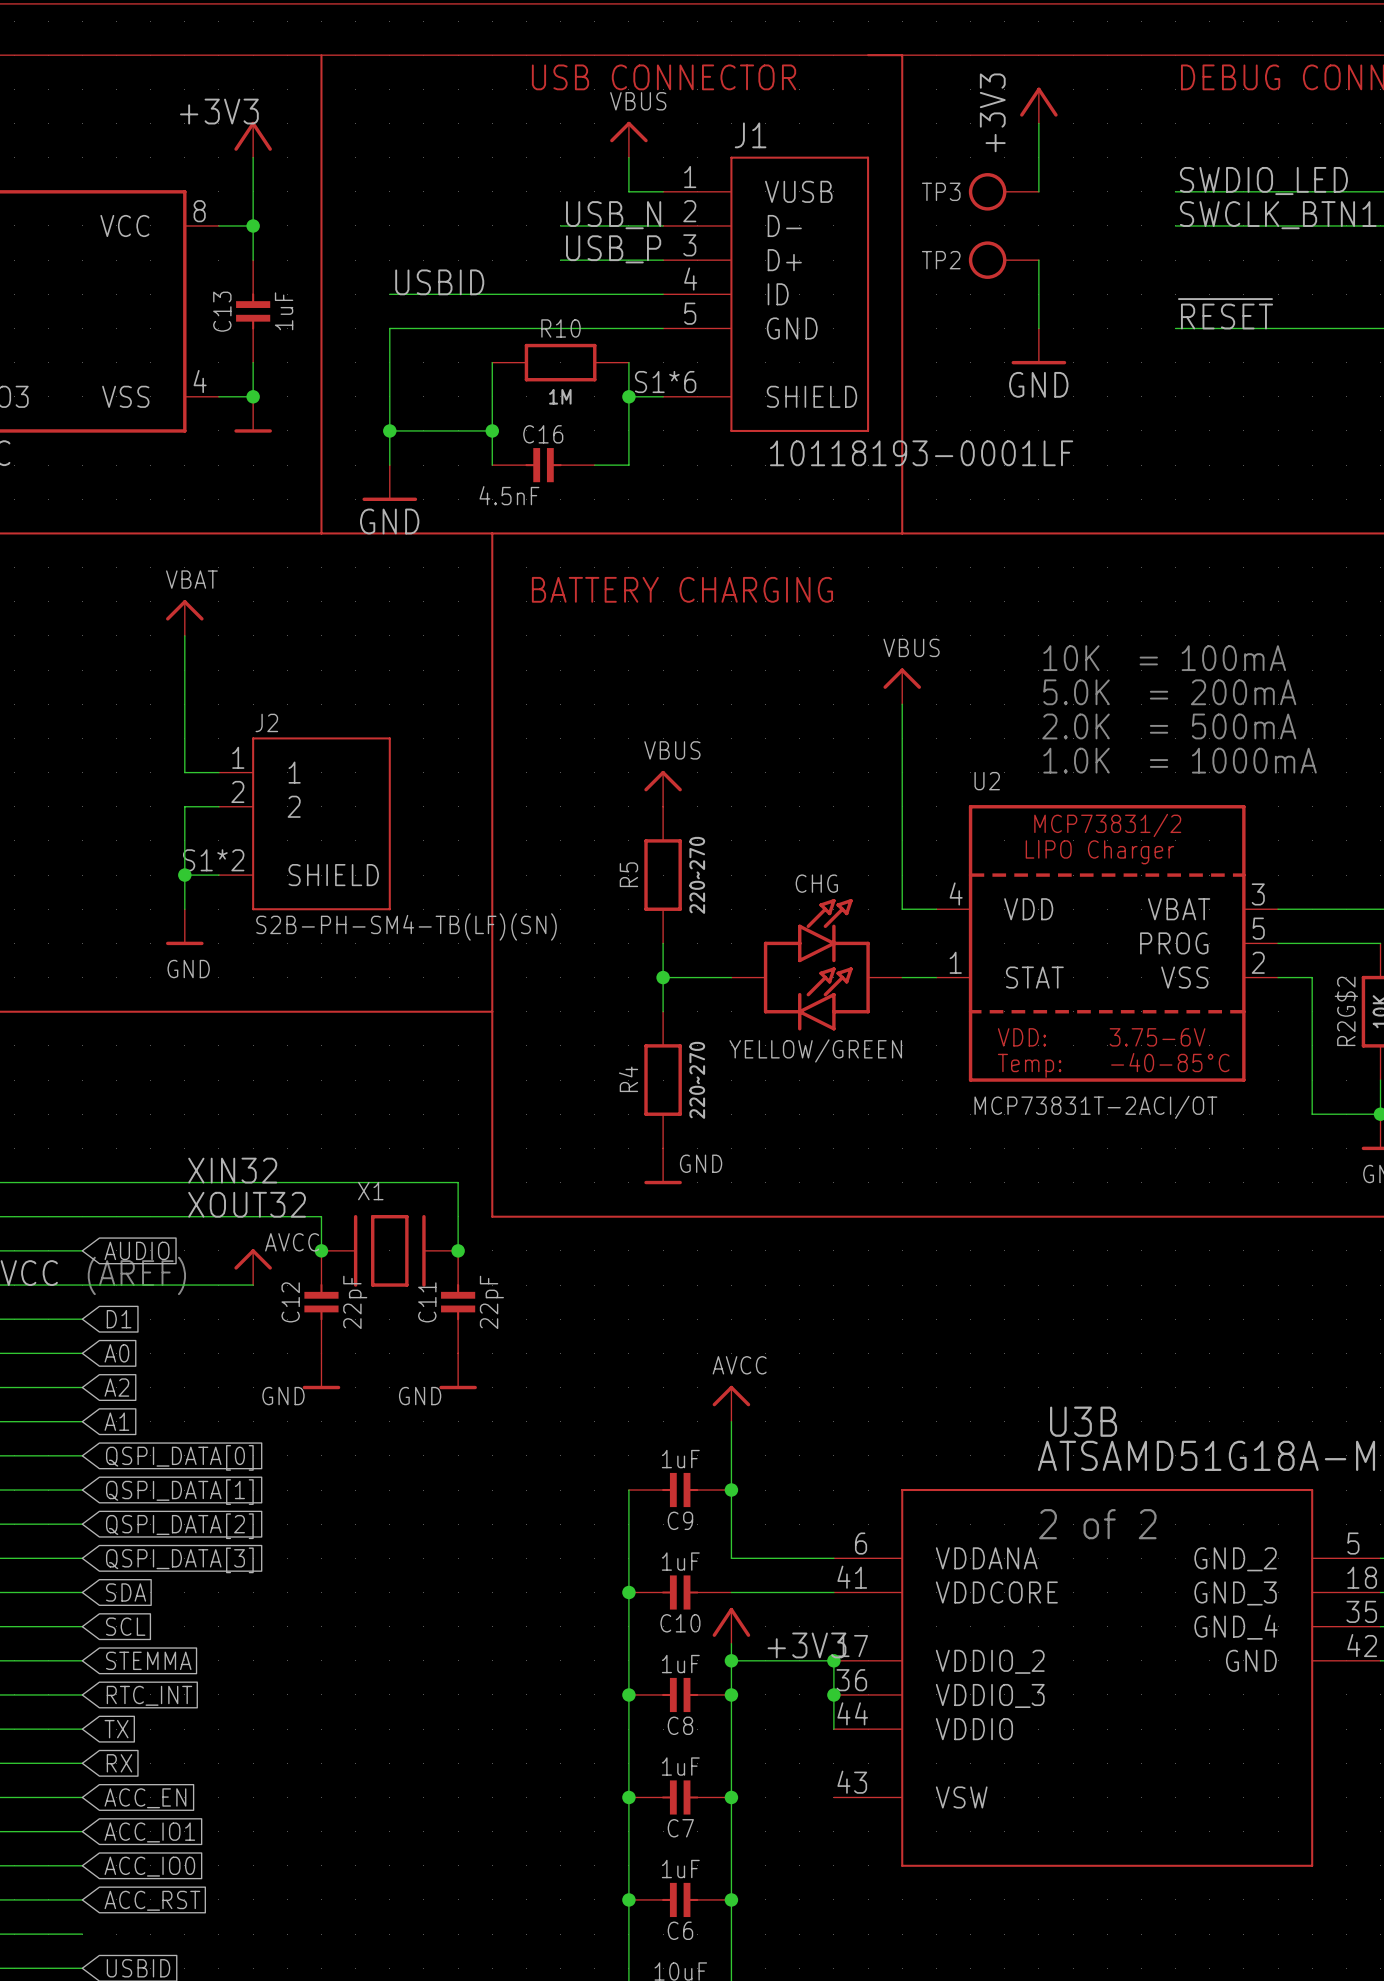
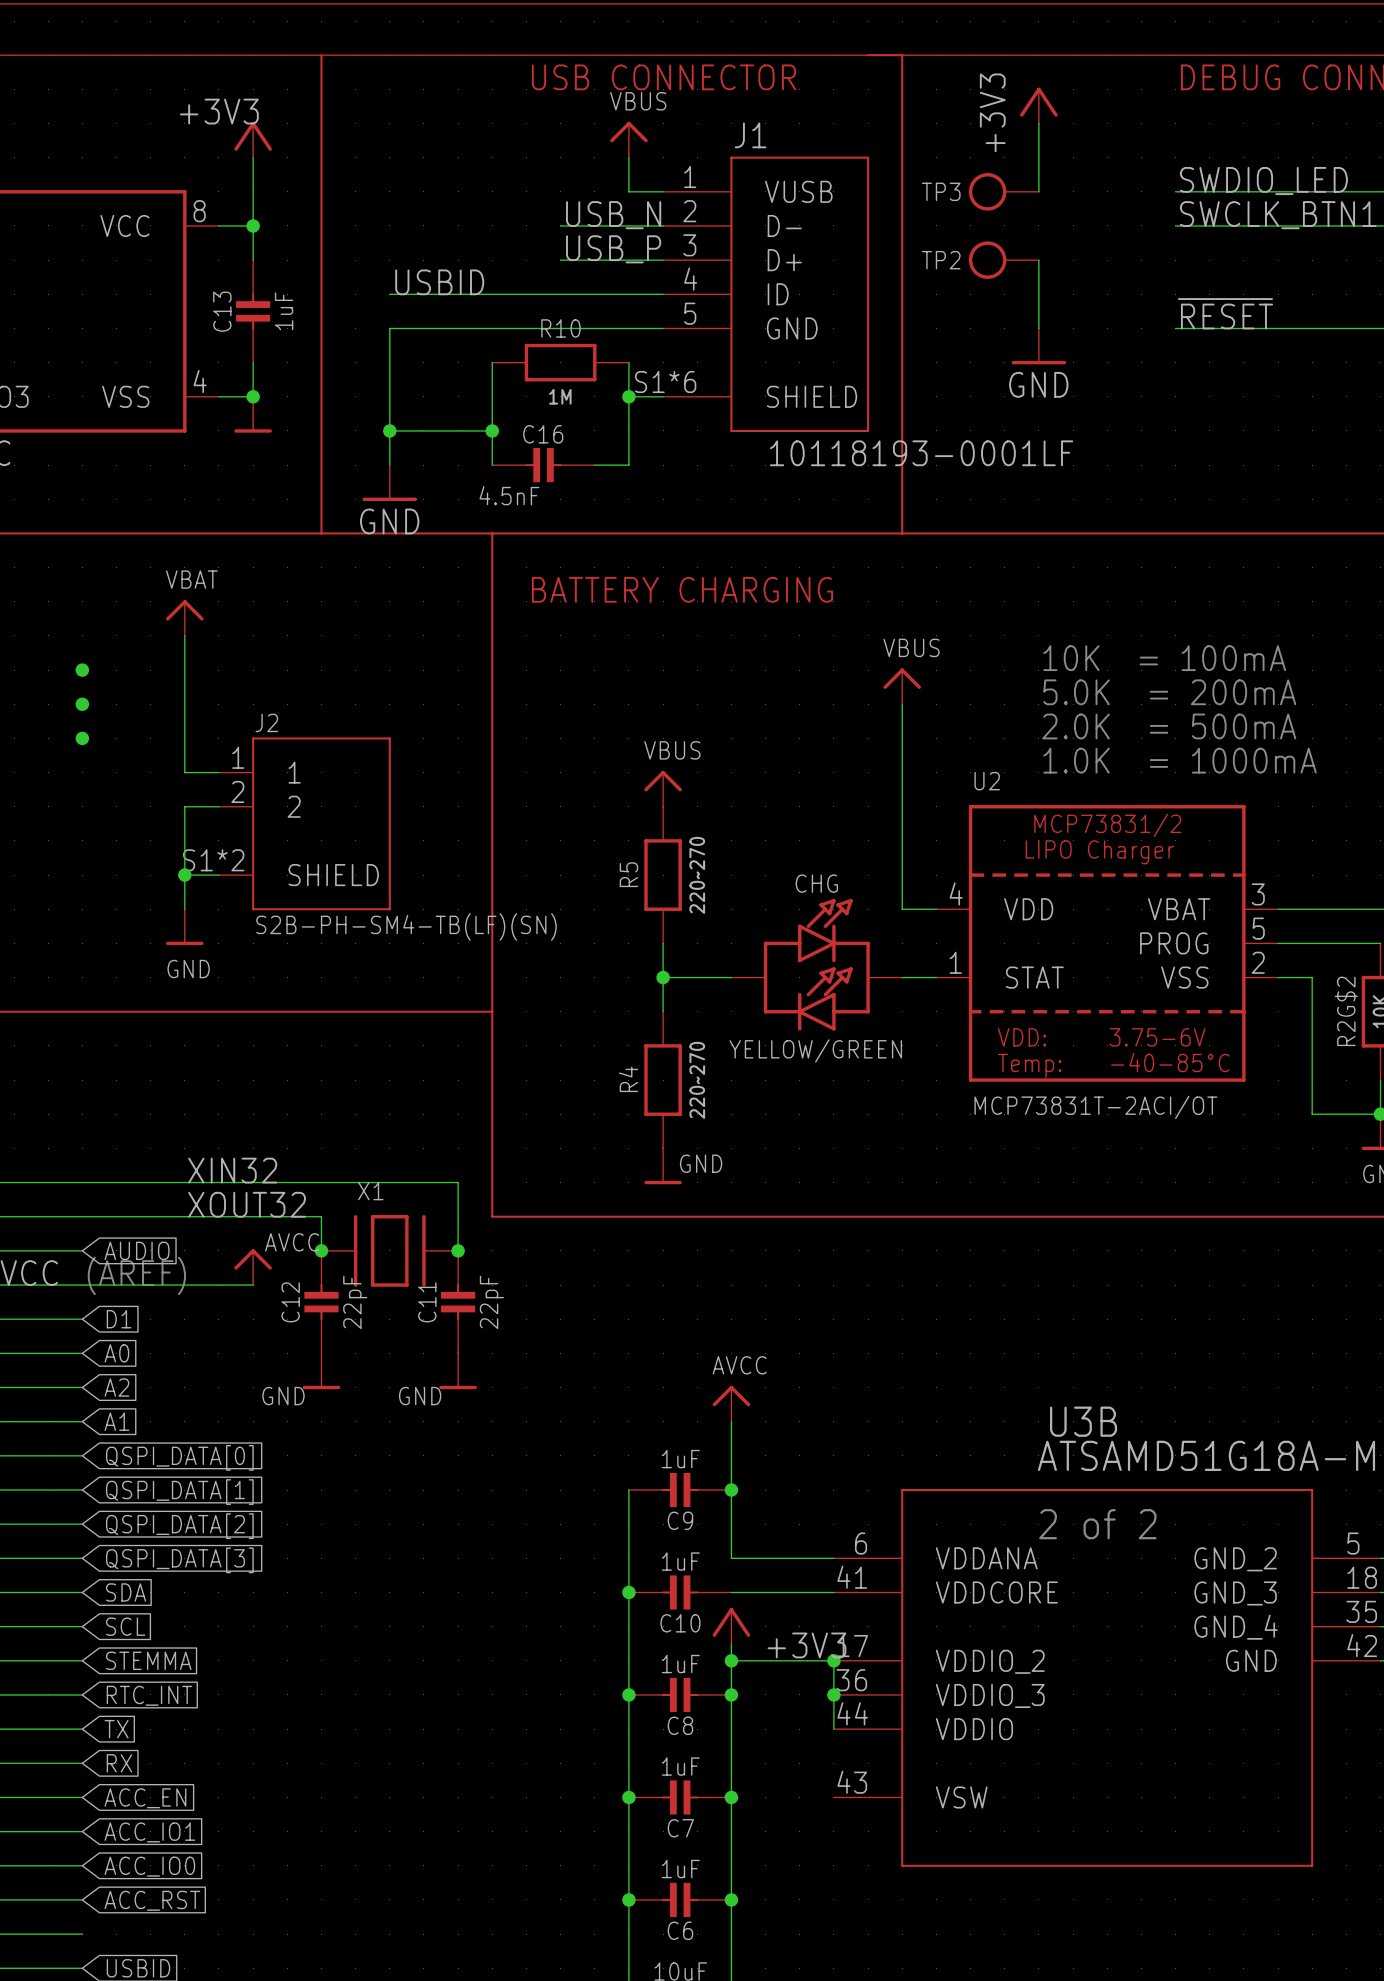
junction: none -> (82, 670)
junction: none -> (82, 704)
junction: none -> (82, 738)

